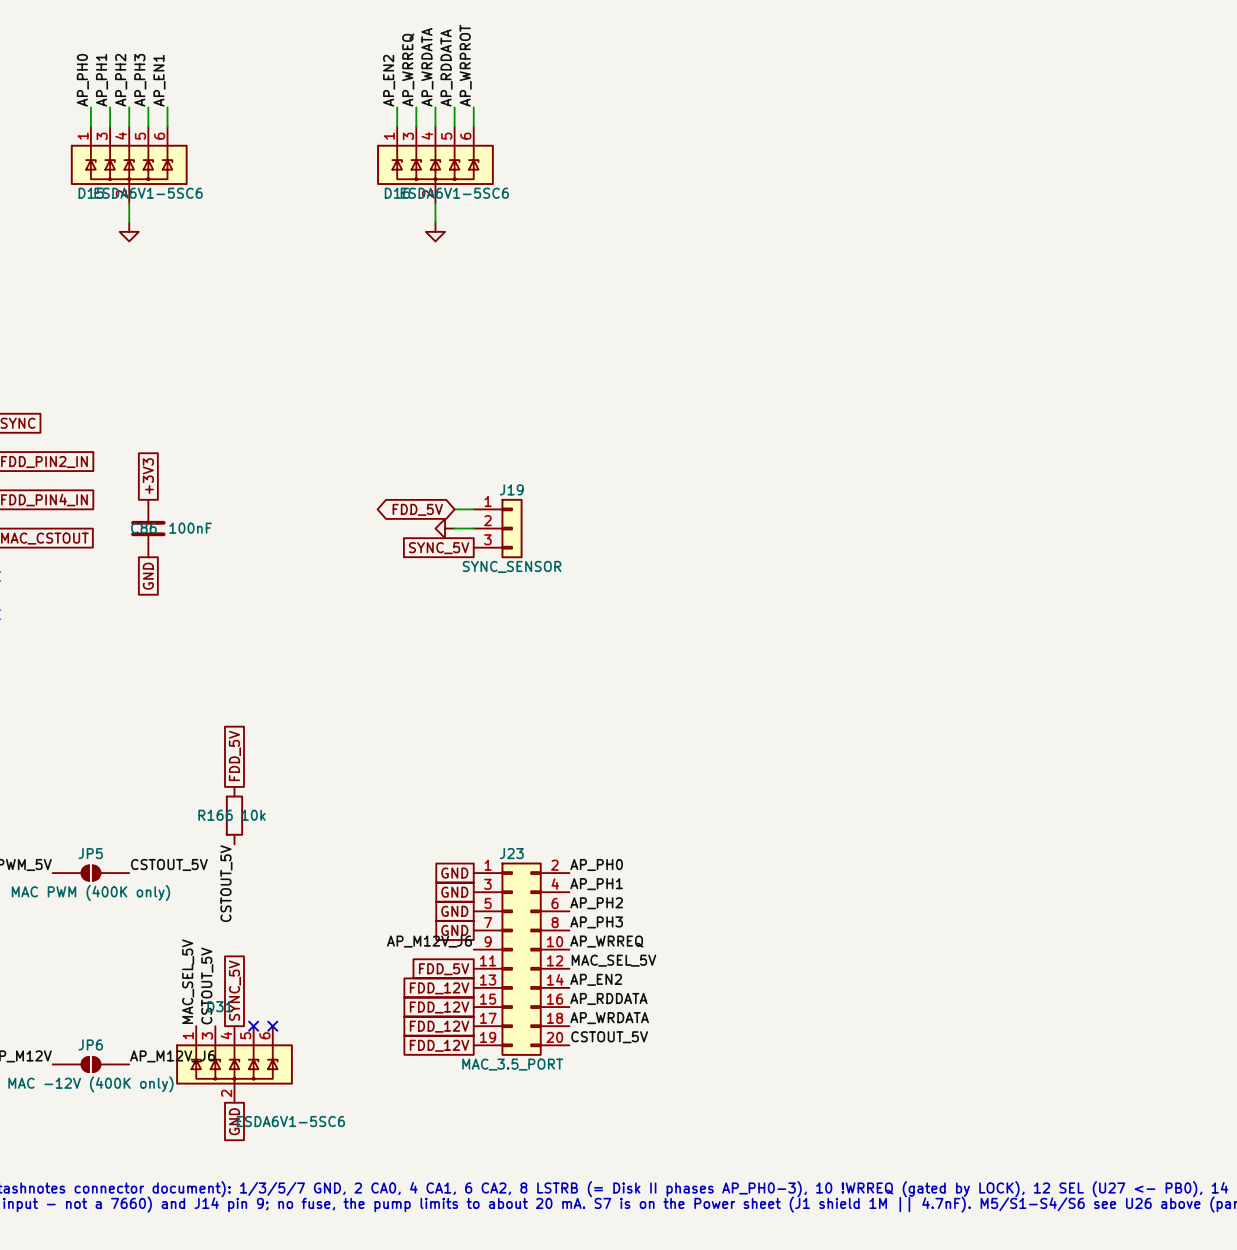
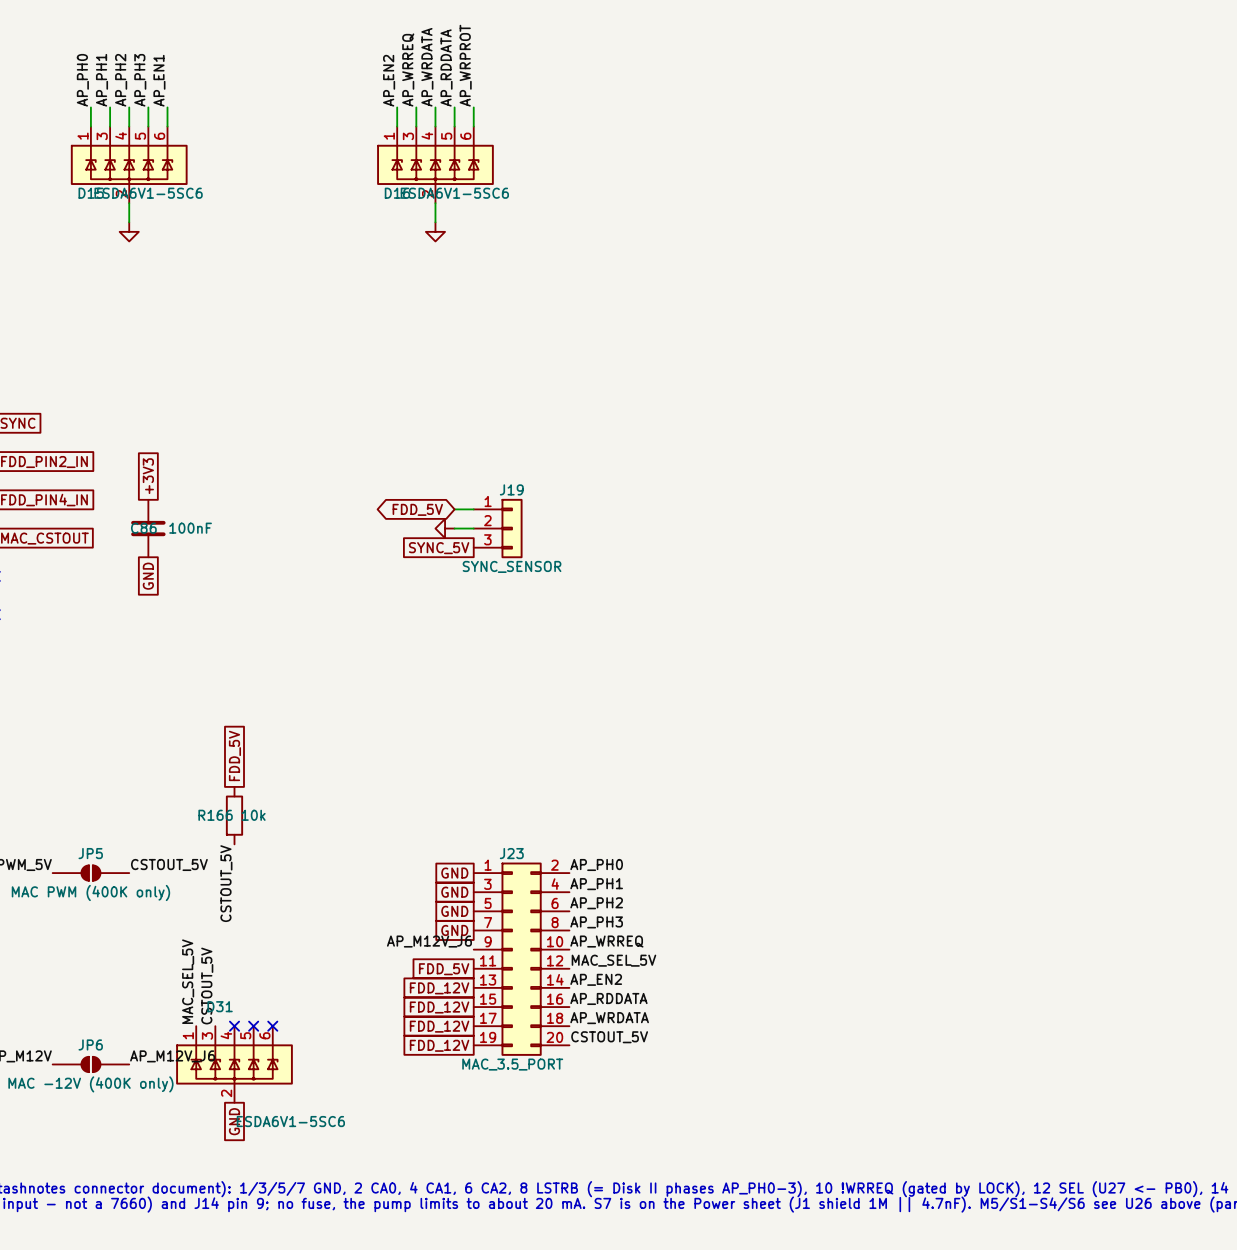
global label: SYNC_5V (234, 990) -> none
no-connect mark: none -> (234, 1026)

